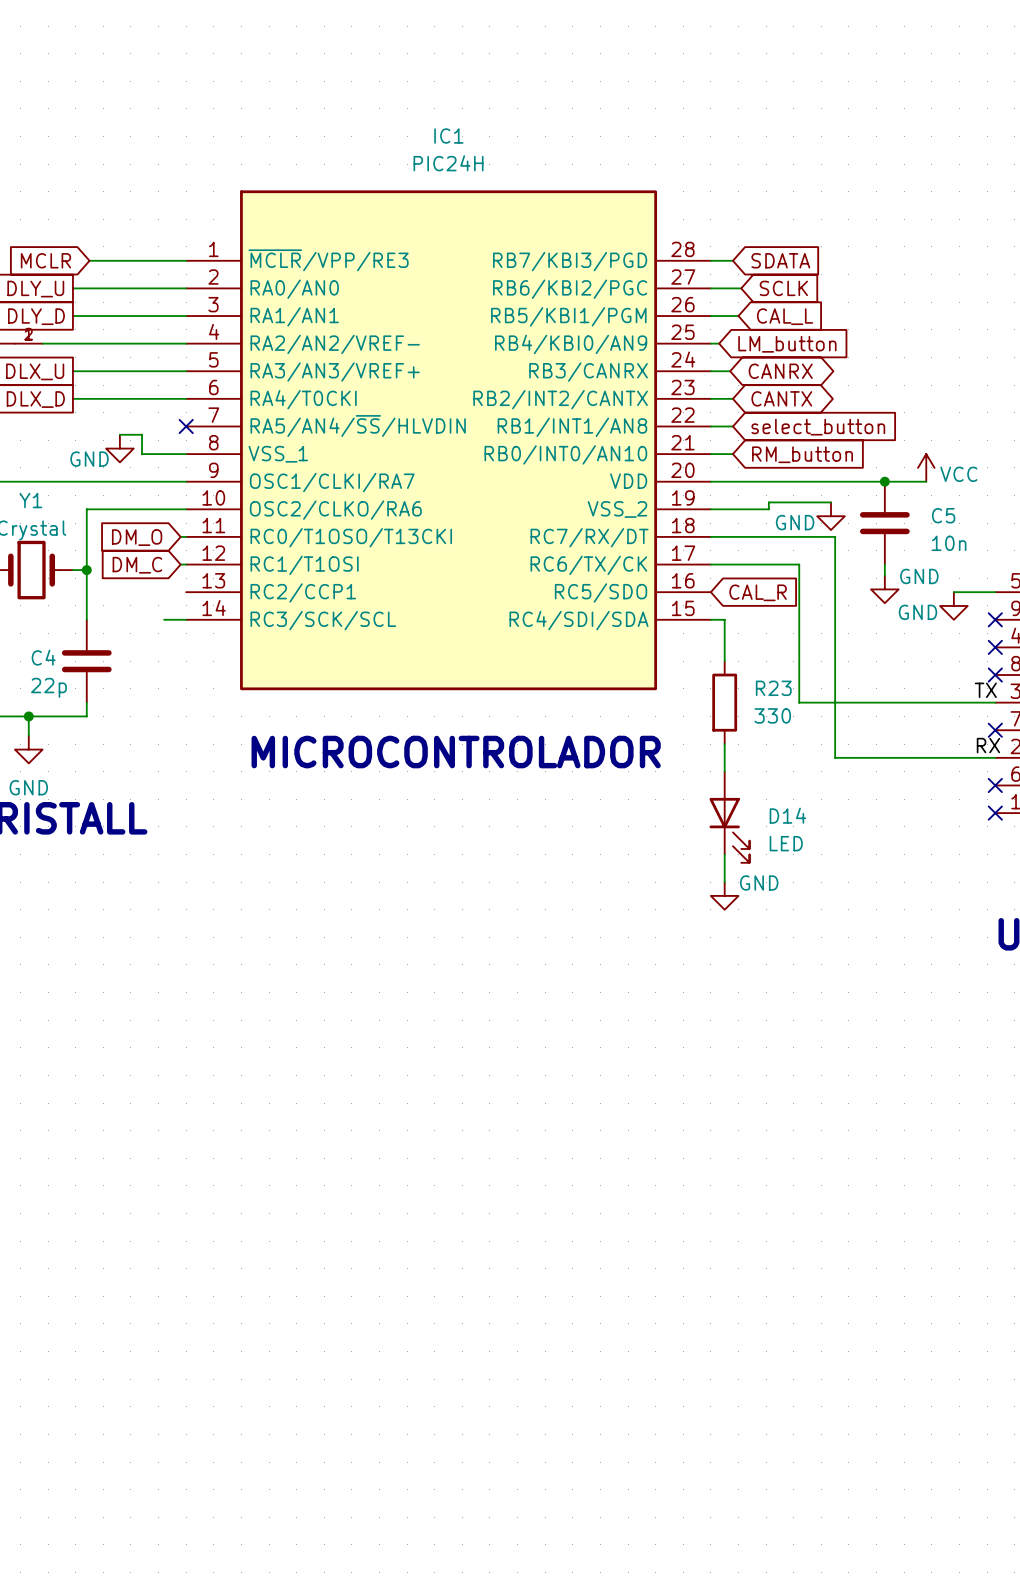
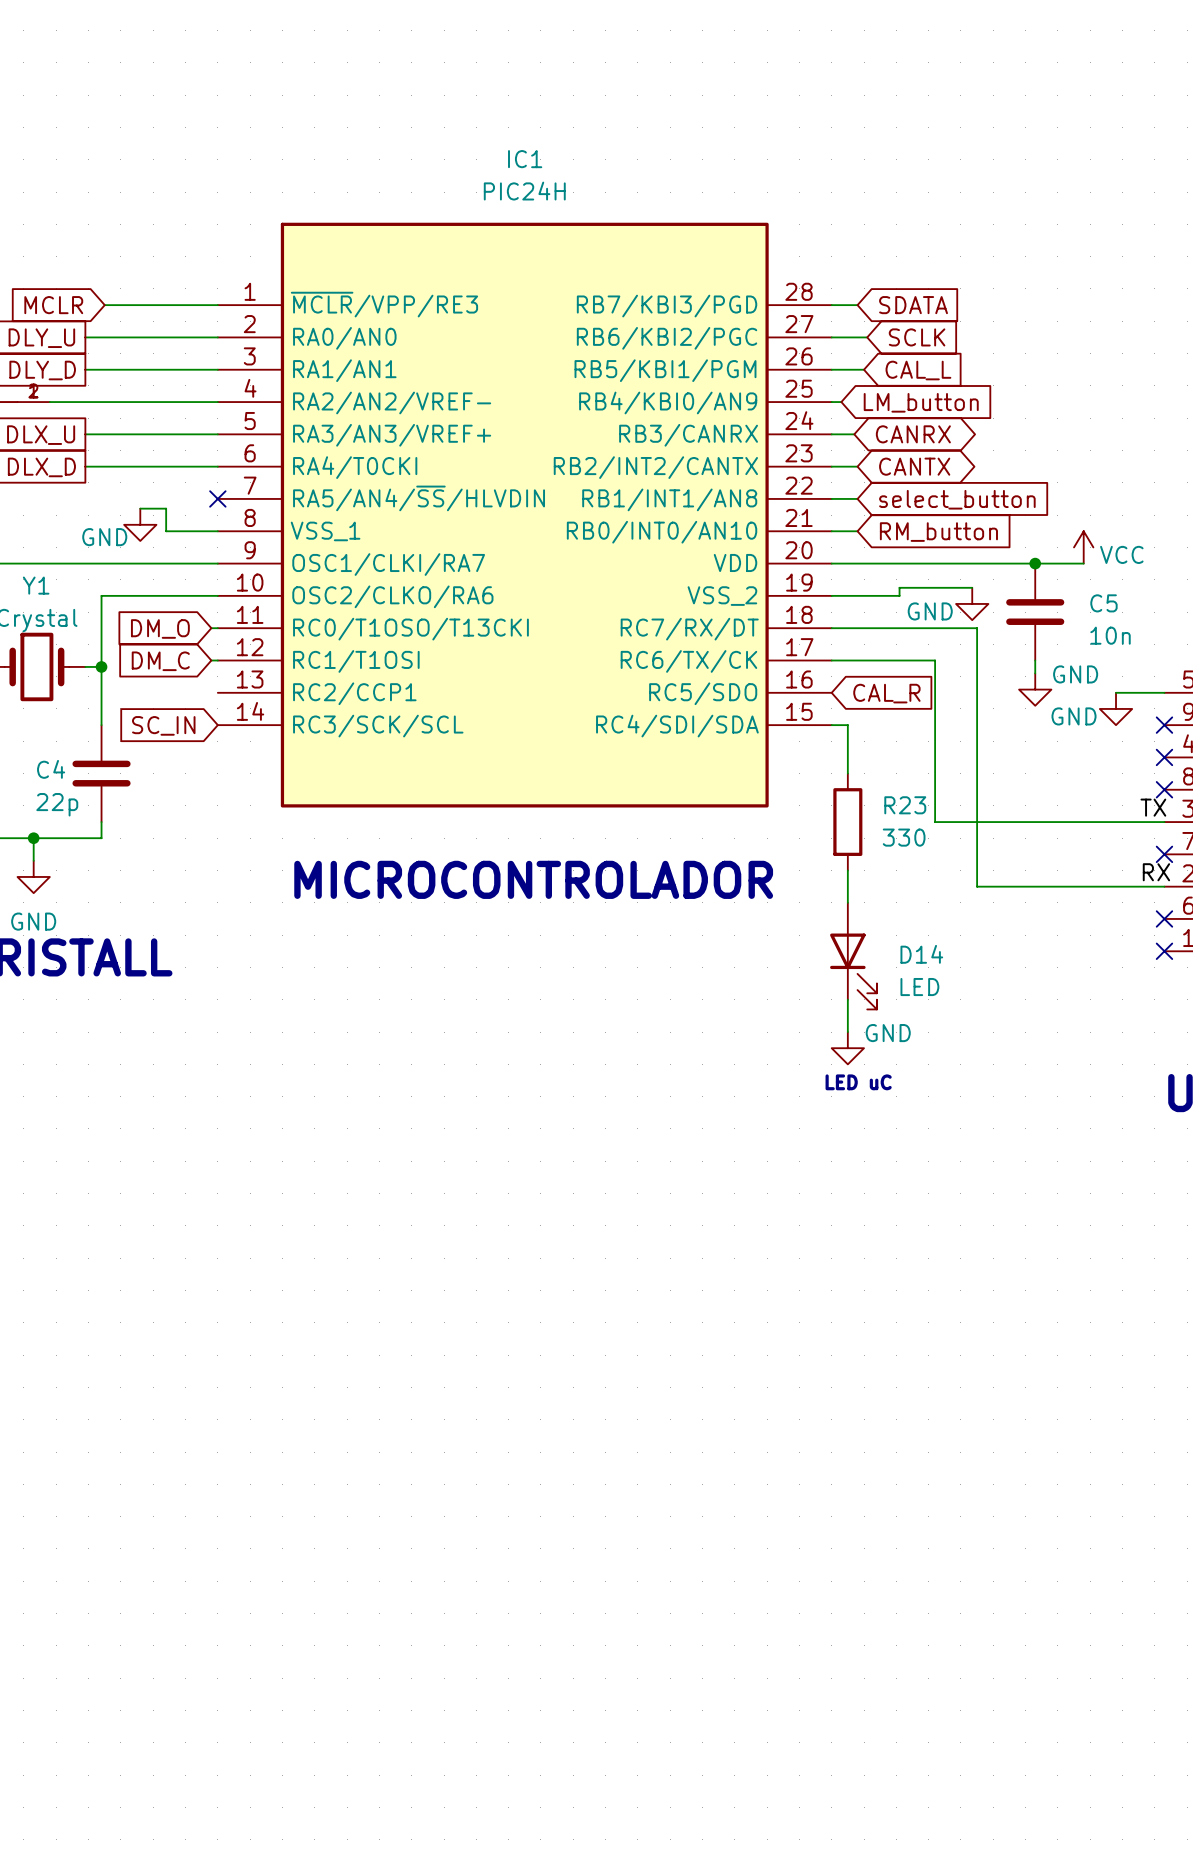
wire: (164, 619) (186, 619) -> none
global label: none -> SC_IN (163, 725)
text: none -> LED uC (858, 1082)

